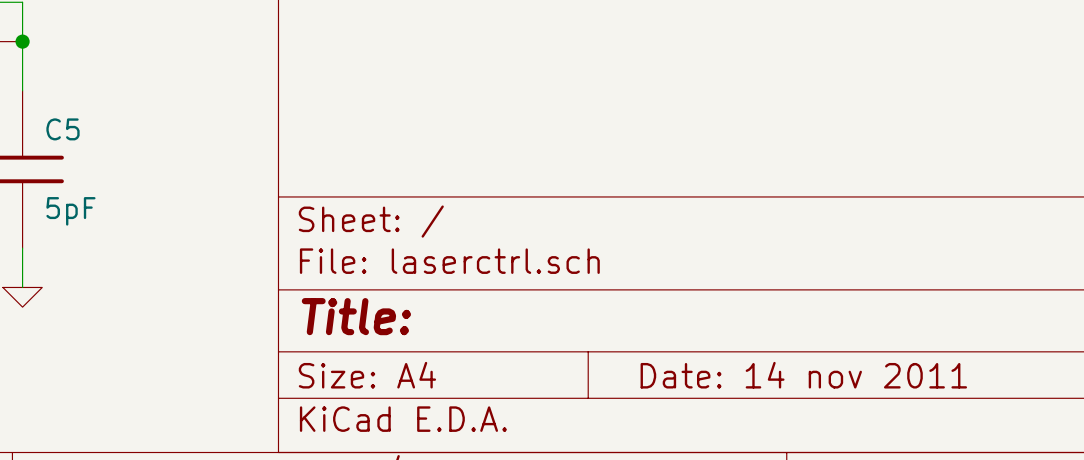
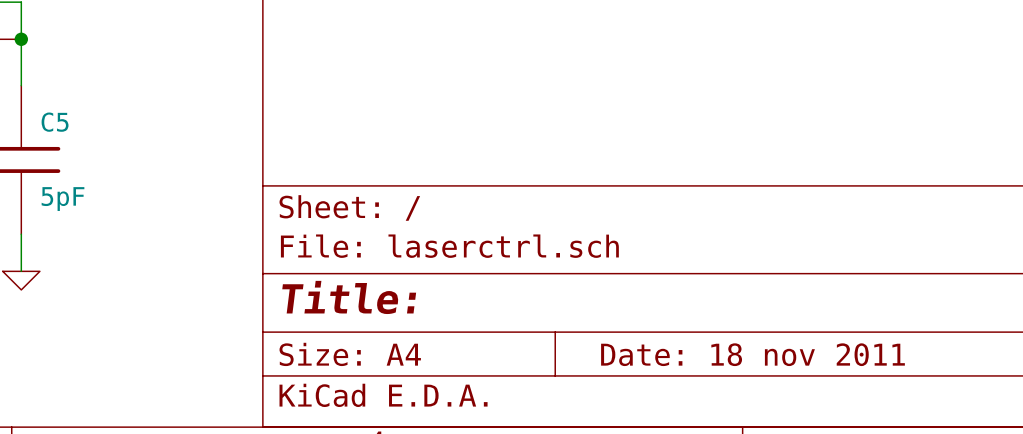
title block: Date: 14 nov 2011 (803, 375) -> Date: 18 nov 2011 (752, 354)

